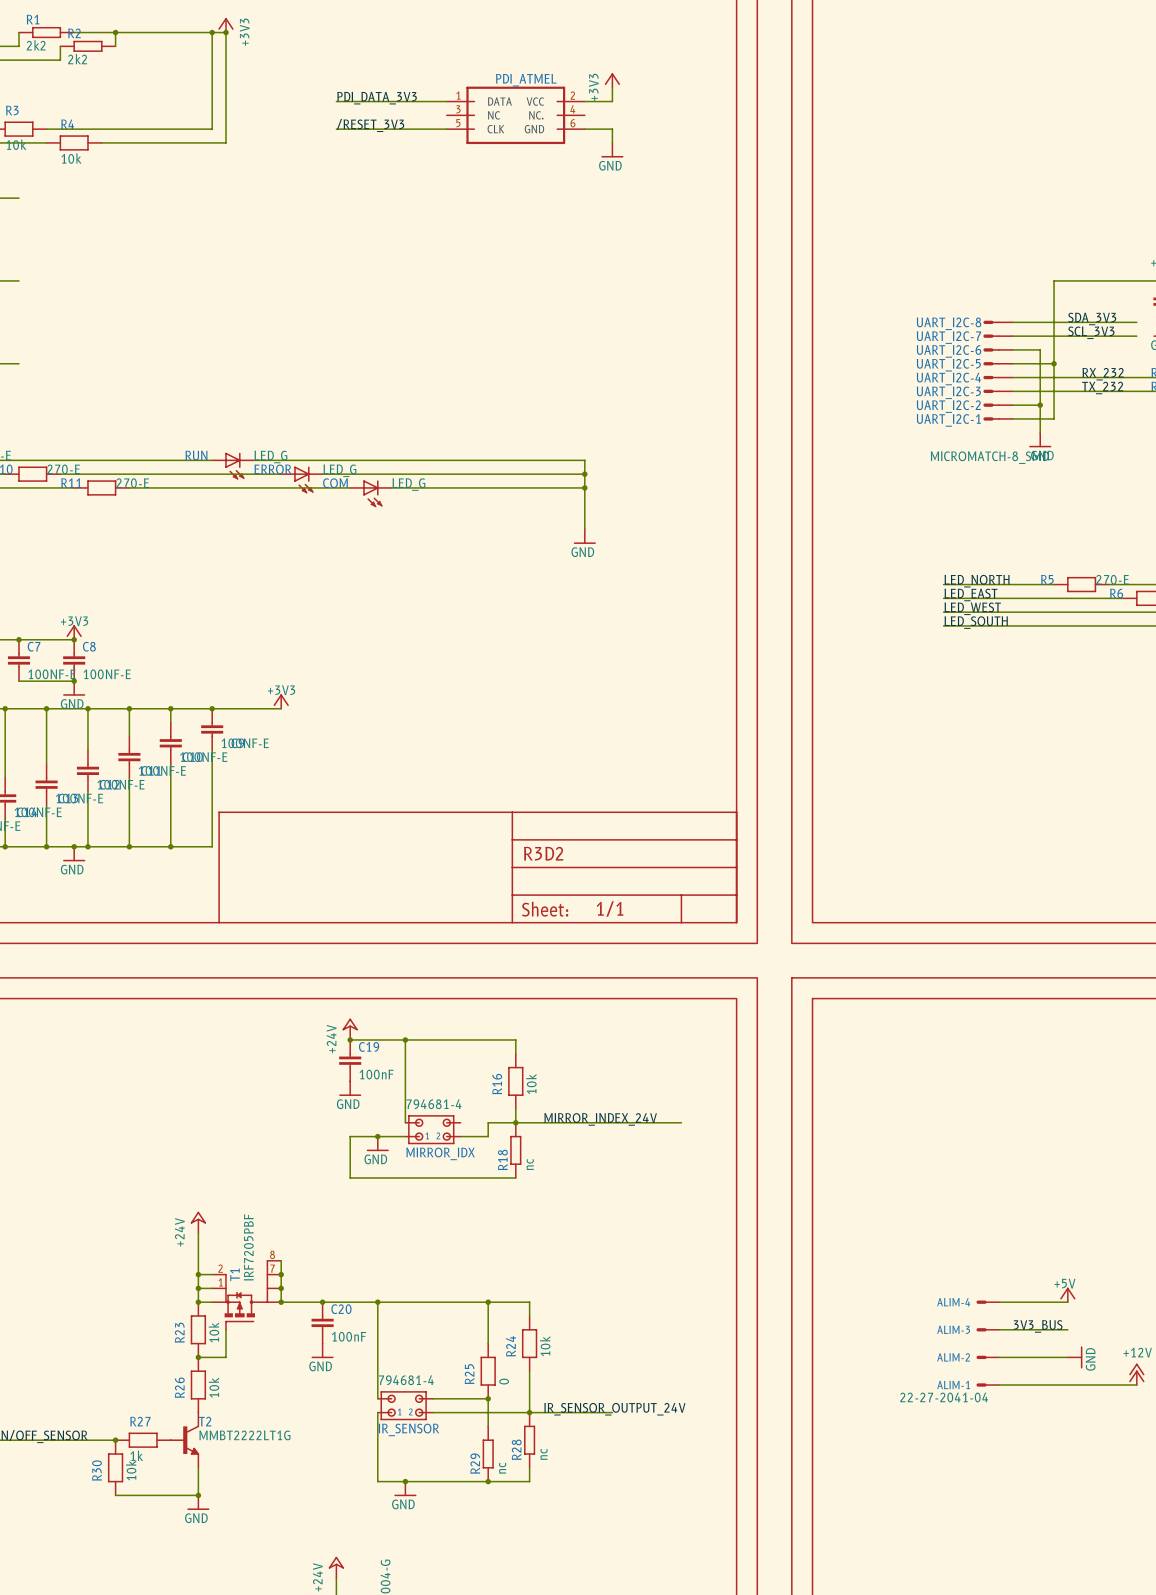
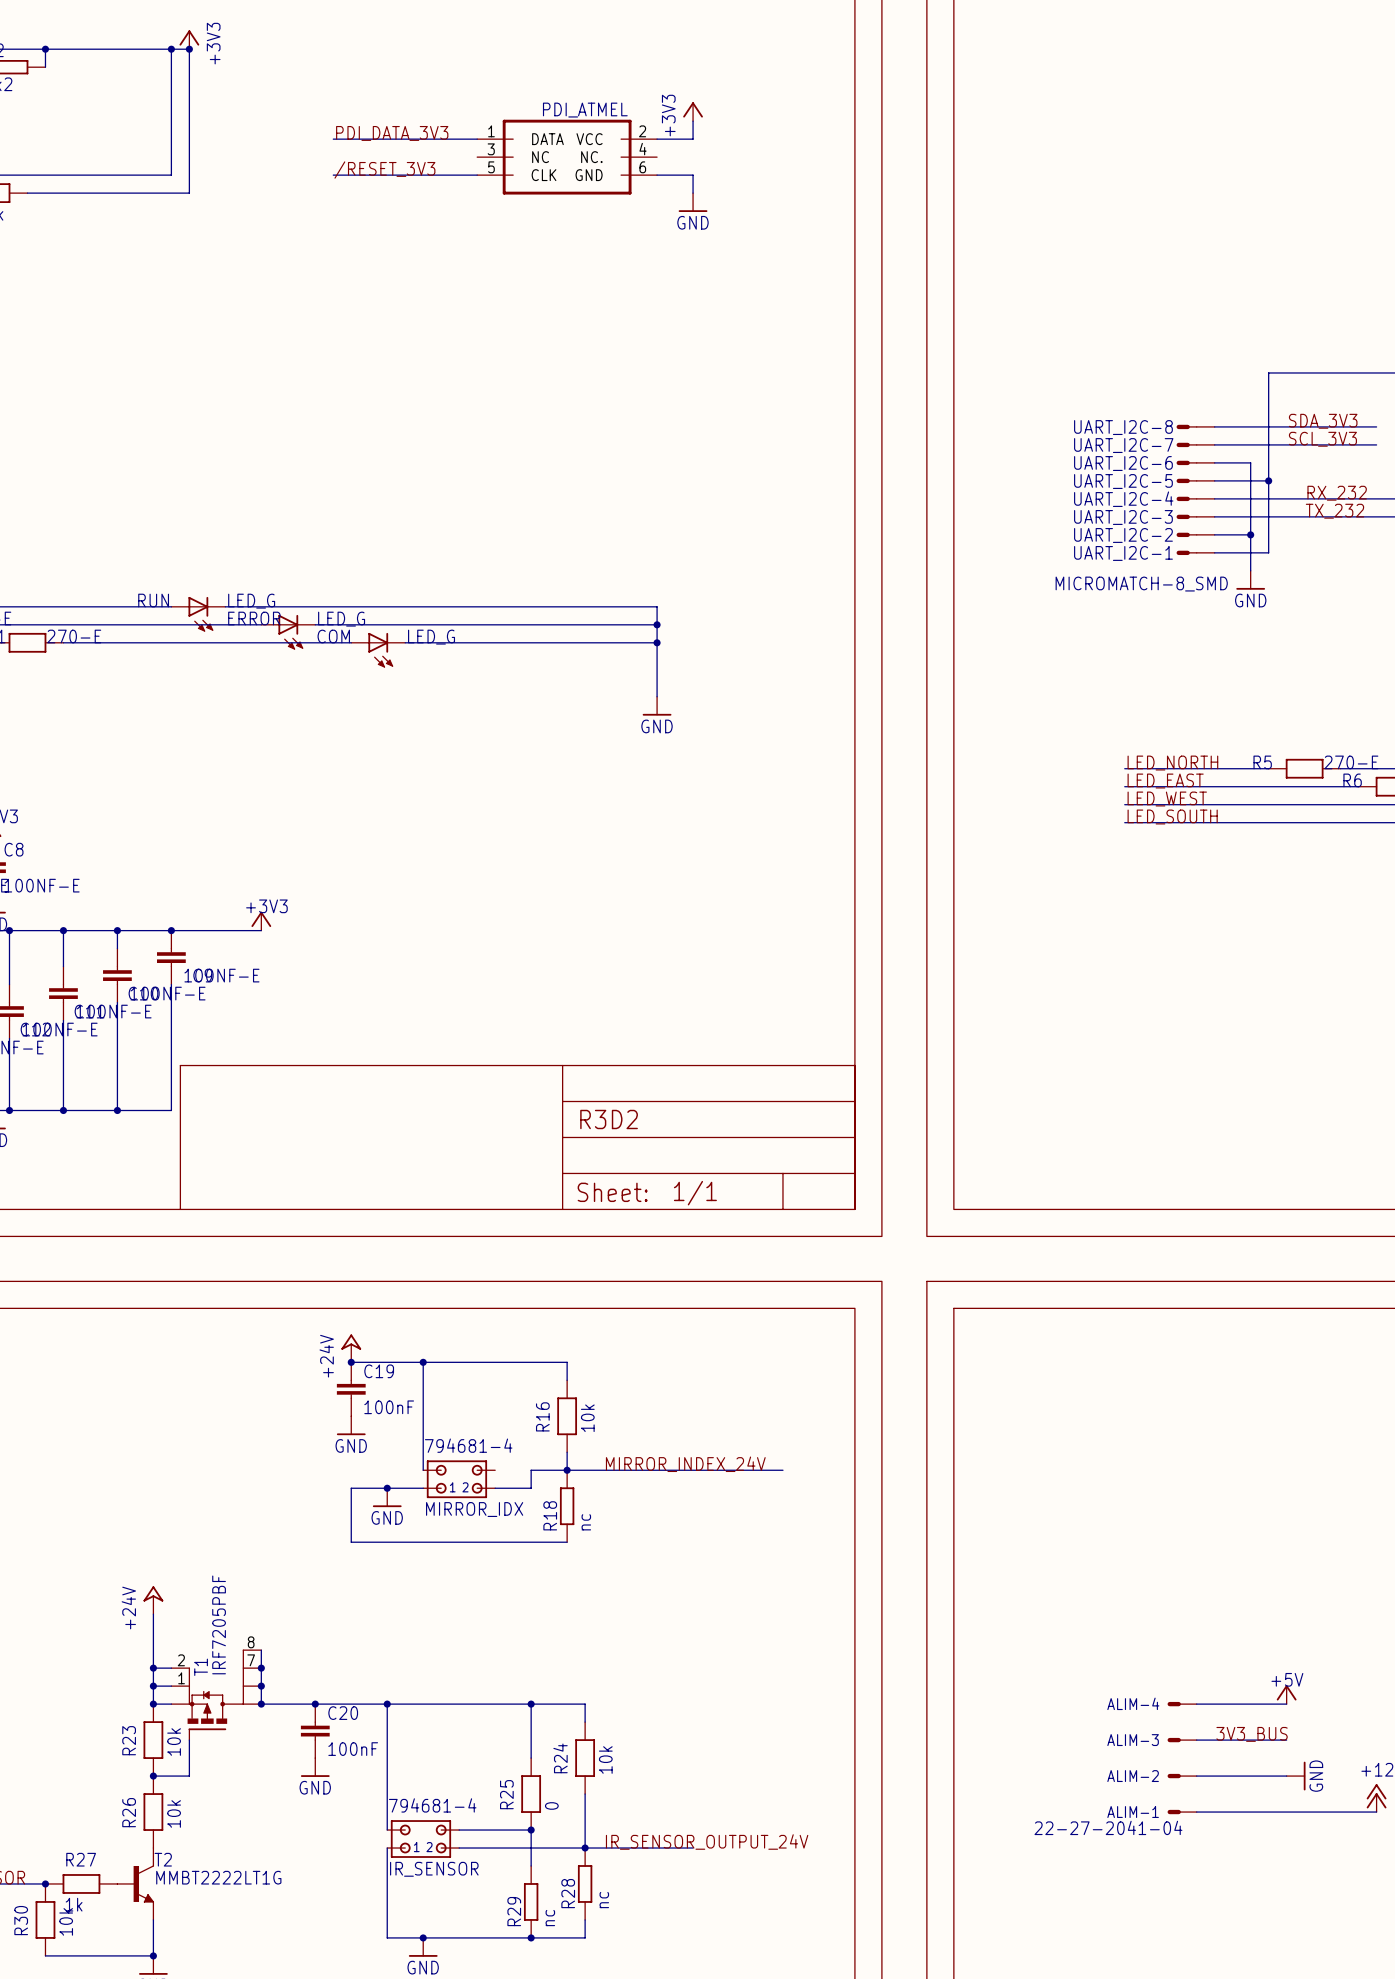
UART_I2C-1 value position: MICROMATCH-8_SMD (989, 457) -> MICROMATCH-8_SMD (1141, 584)

